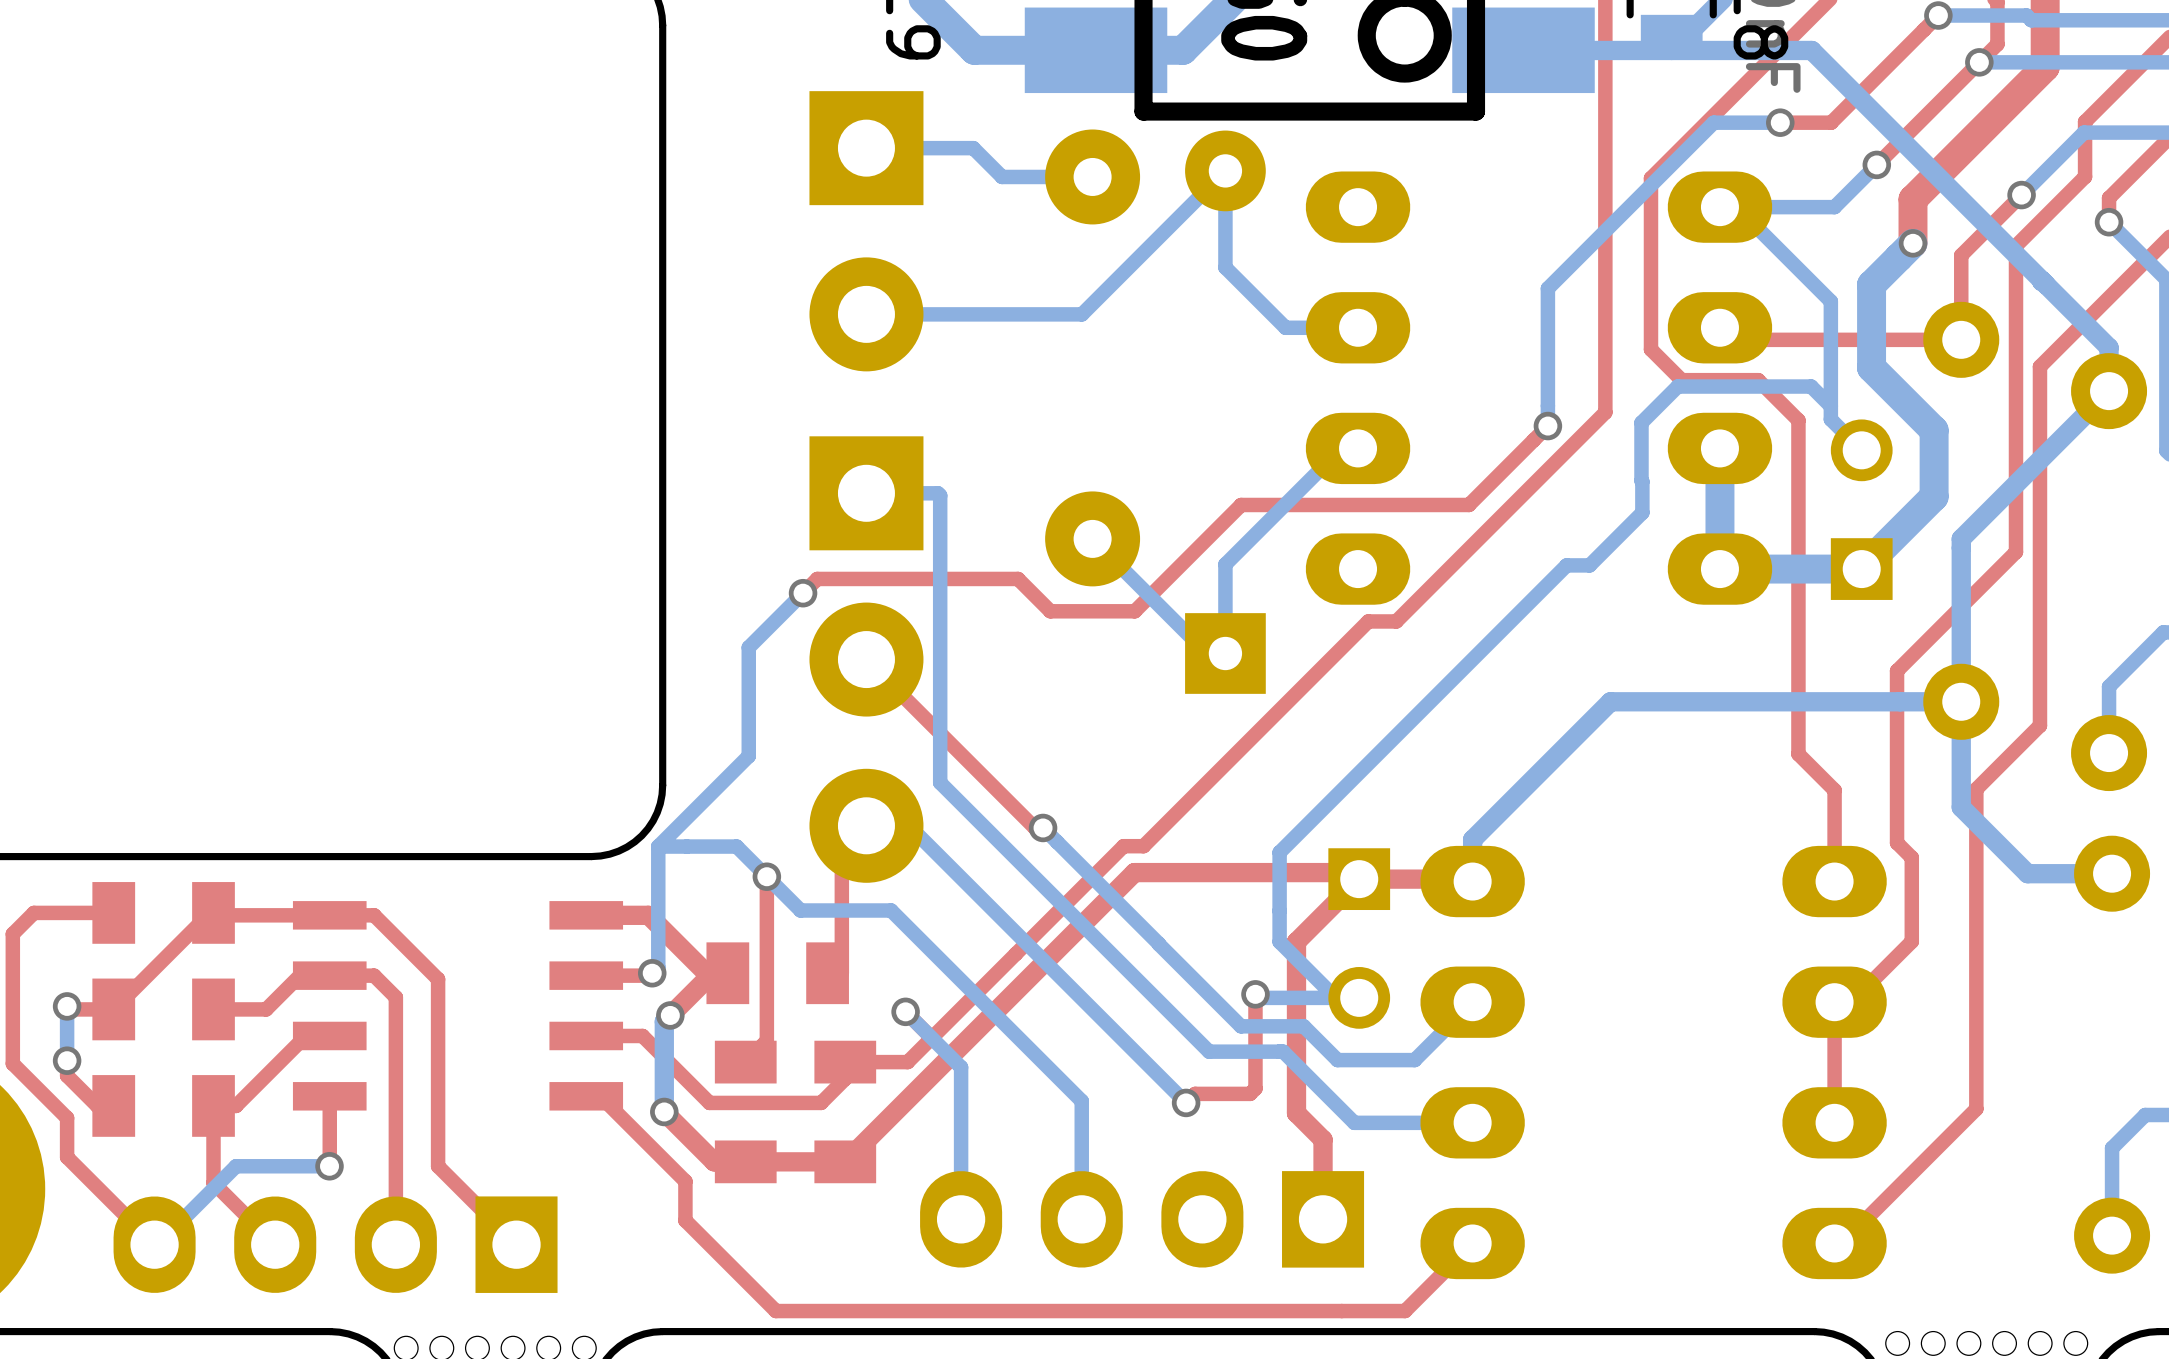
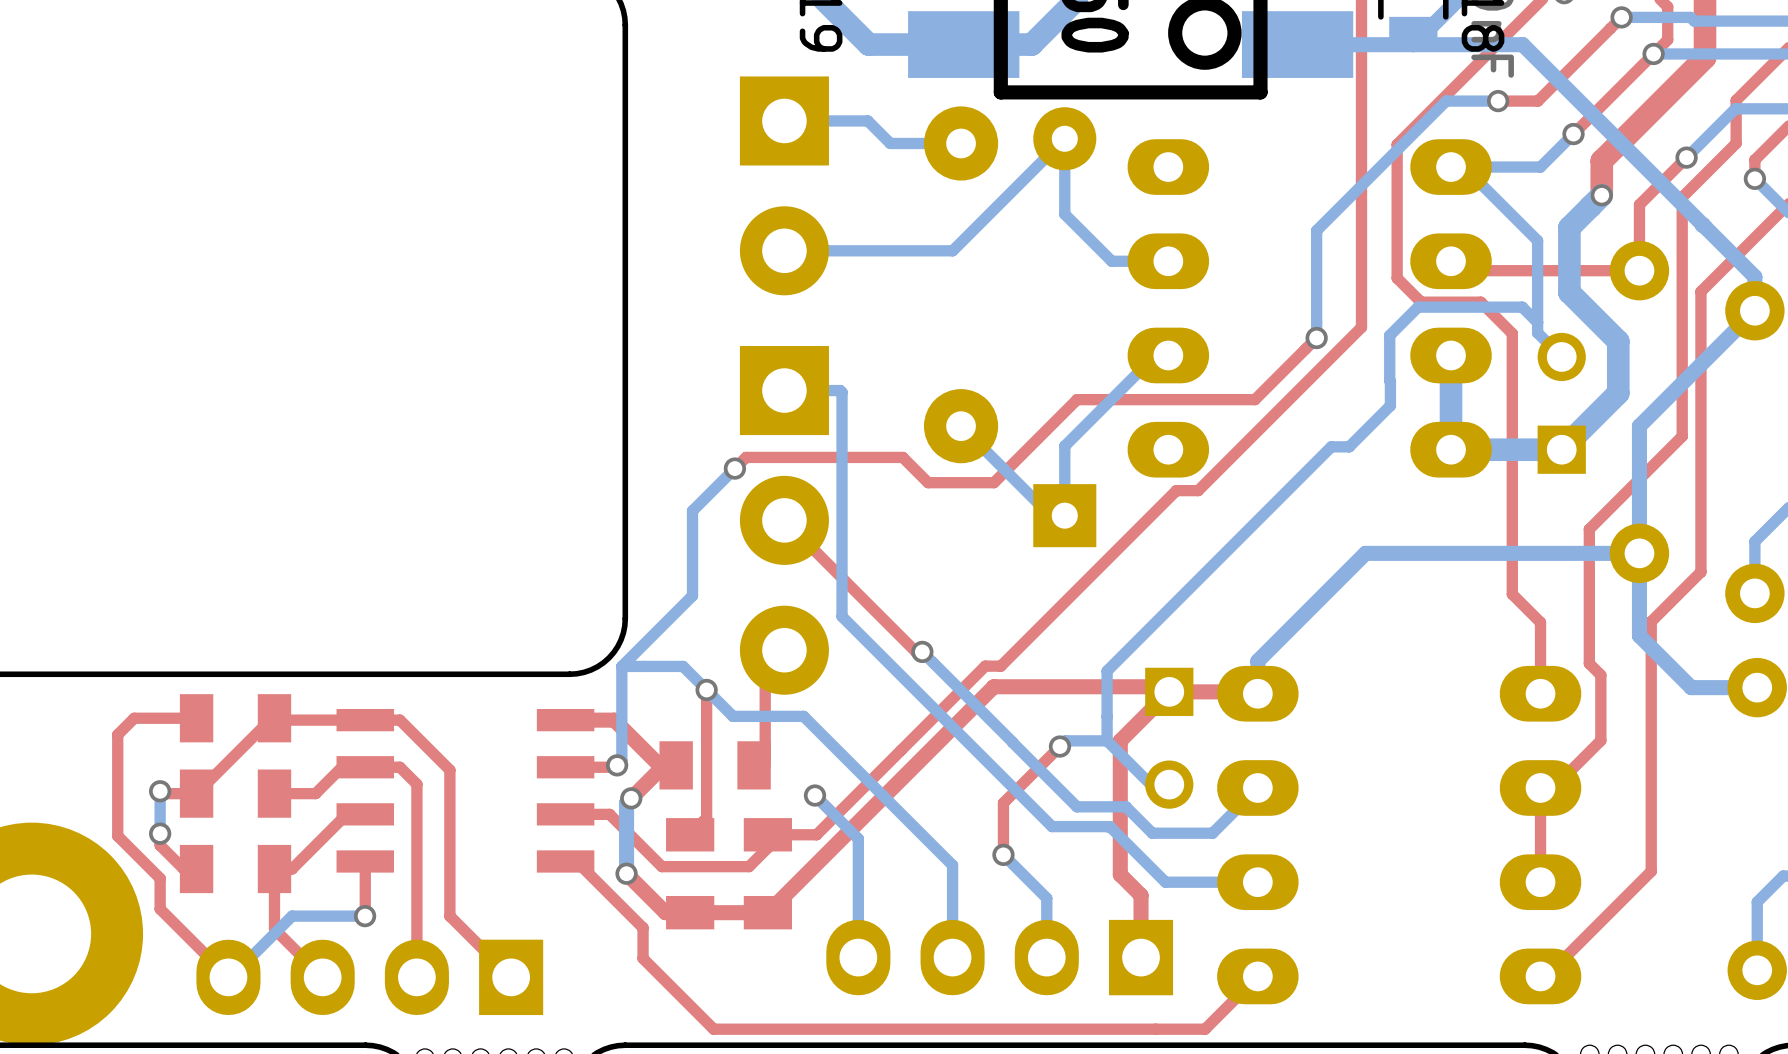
bottom track: (908, 825) (1186, 1102) -> none
bottom track: none -> (1107, 740) (1065, 740) (1059, 746)
top track: none -> (1059, 746) (1003, 803) (1003, 854)
bottom track: (1255, 994) (1259, 997) (1335, 997) -> none
top track: (1255, 994) (1255, 1088) (1250, 1093) (1195, 1093) (1186, 1102) -> none
via position: (1255, 994) -> (1059, 746)
bottom track: none -> (1003, 854) (1046, 898) (1046, 957)
via position: (1186, 1102) -> (1003, 854)

